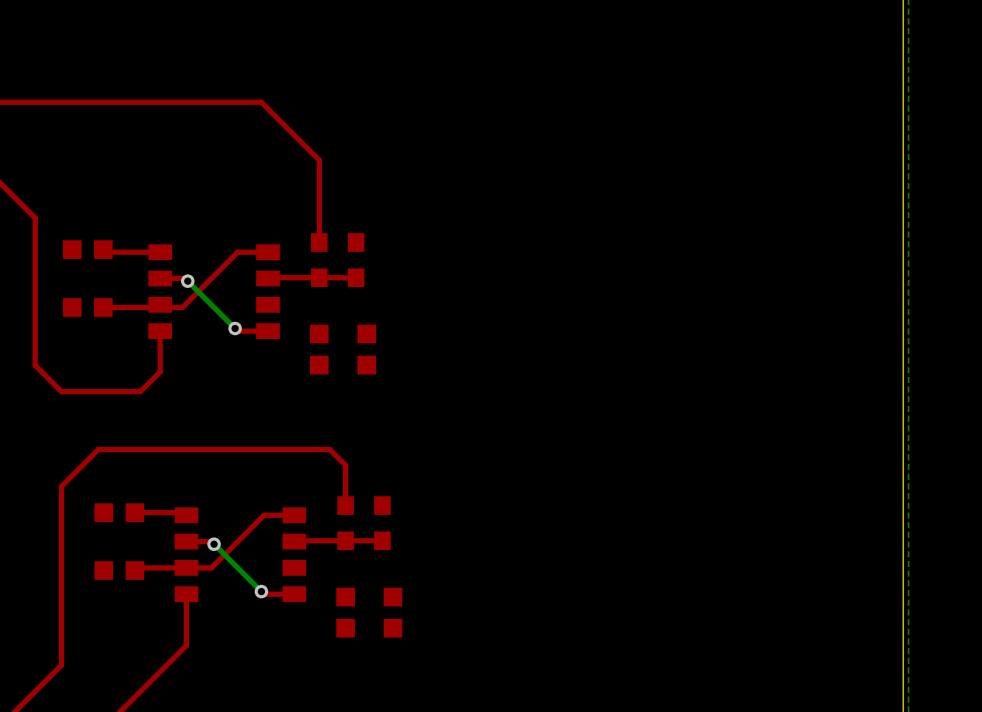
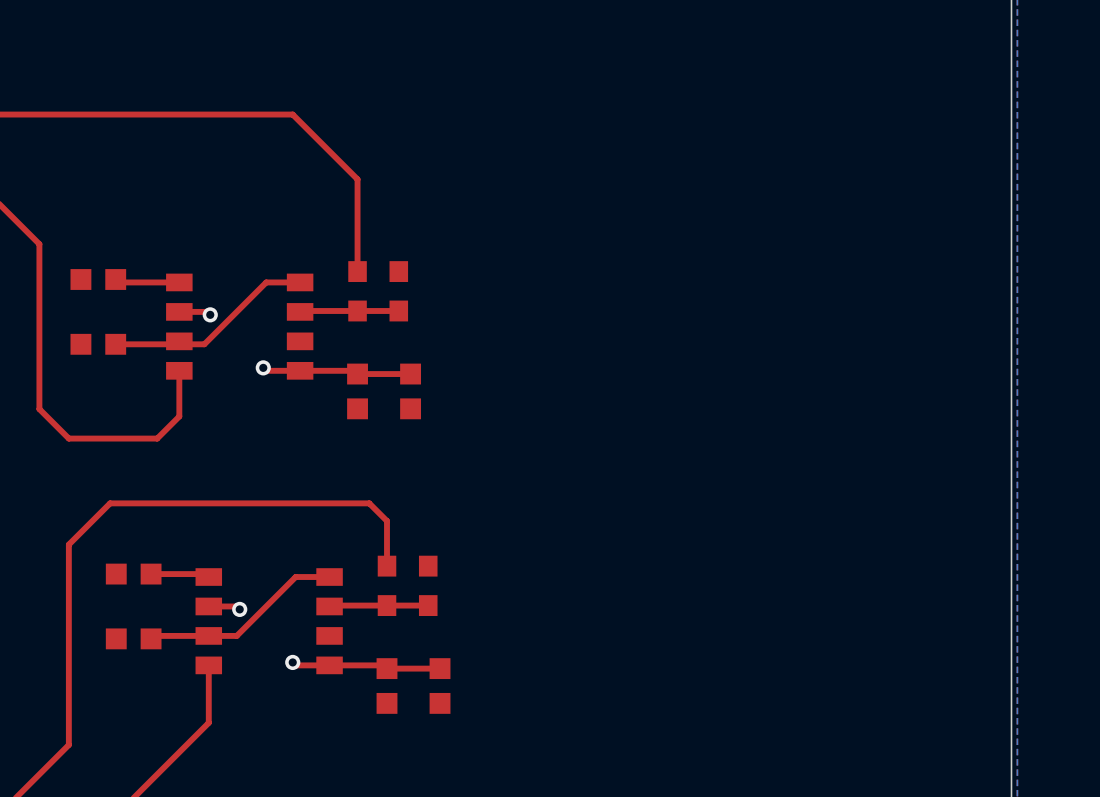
bottom track: (187, 281) (235, 328) -> none
top track: none -> (300, 370) (354, 370) (357, 374) (410, 374)
bottom track: (214, 544) (261, 591) -> none
top track: none -> (329, 665) (383, 665) (387, 668) (440, 668)

